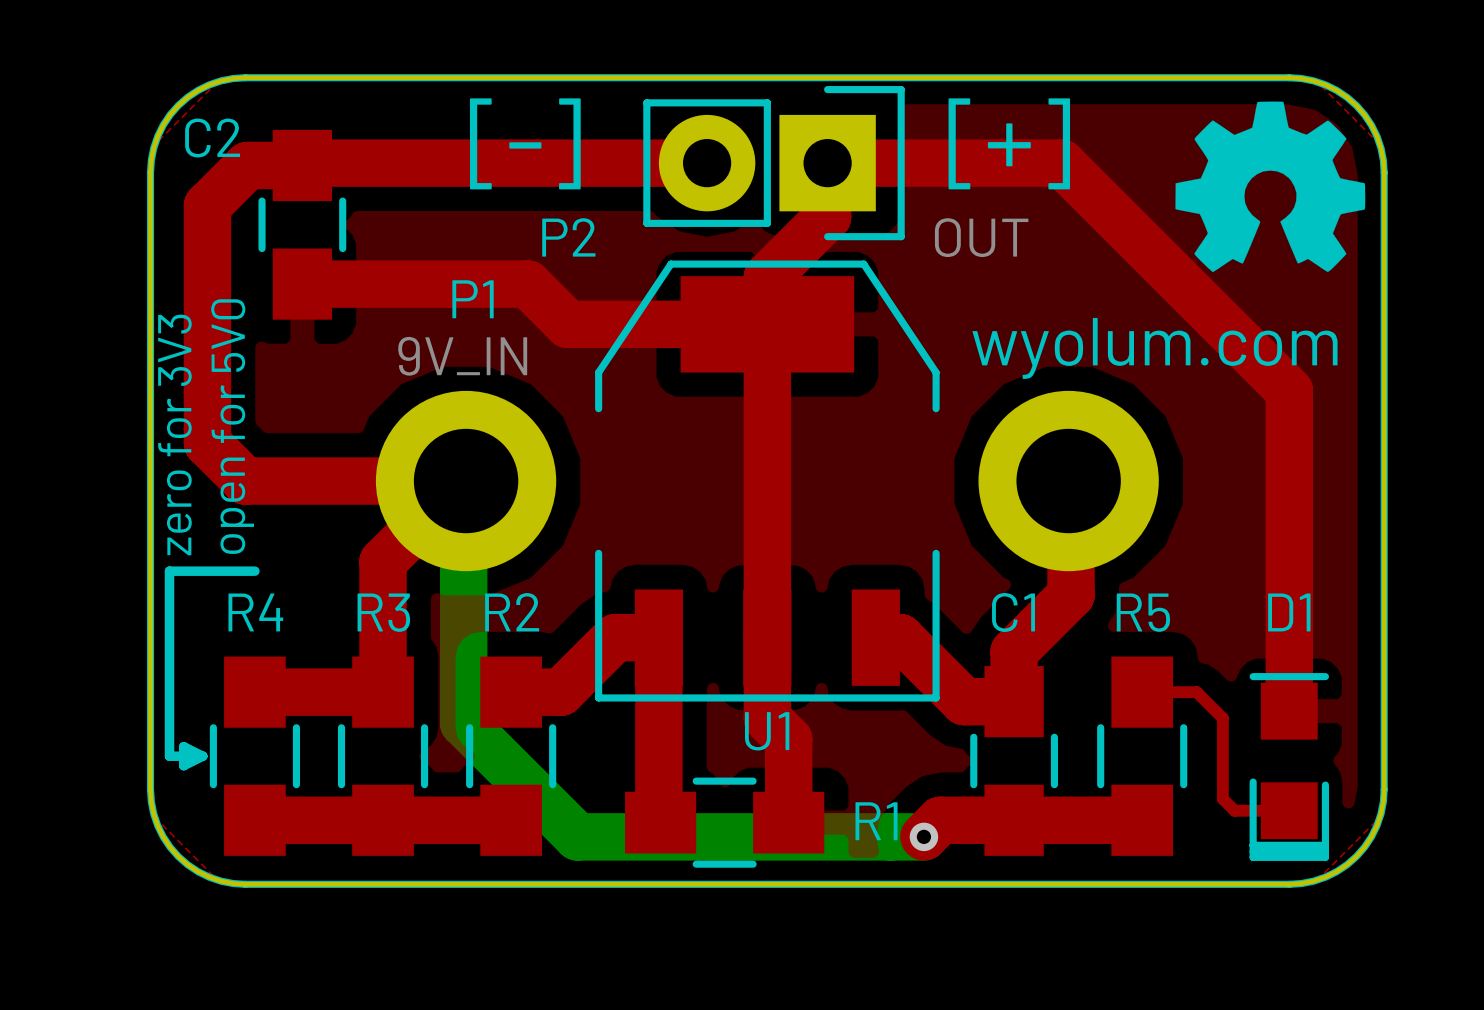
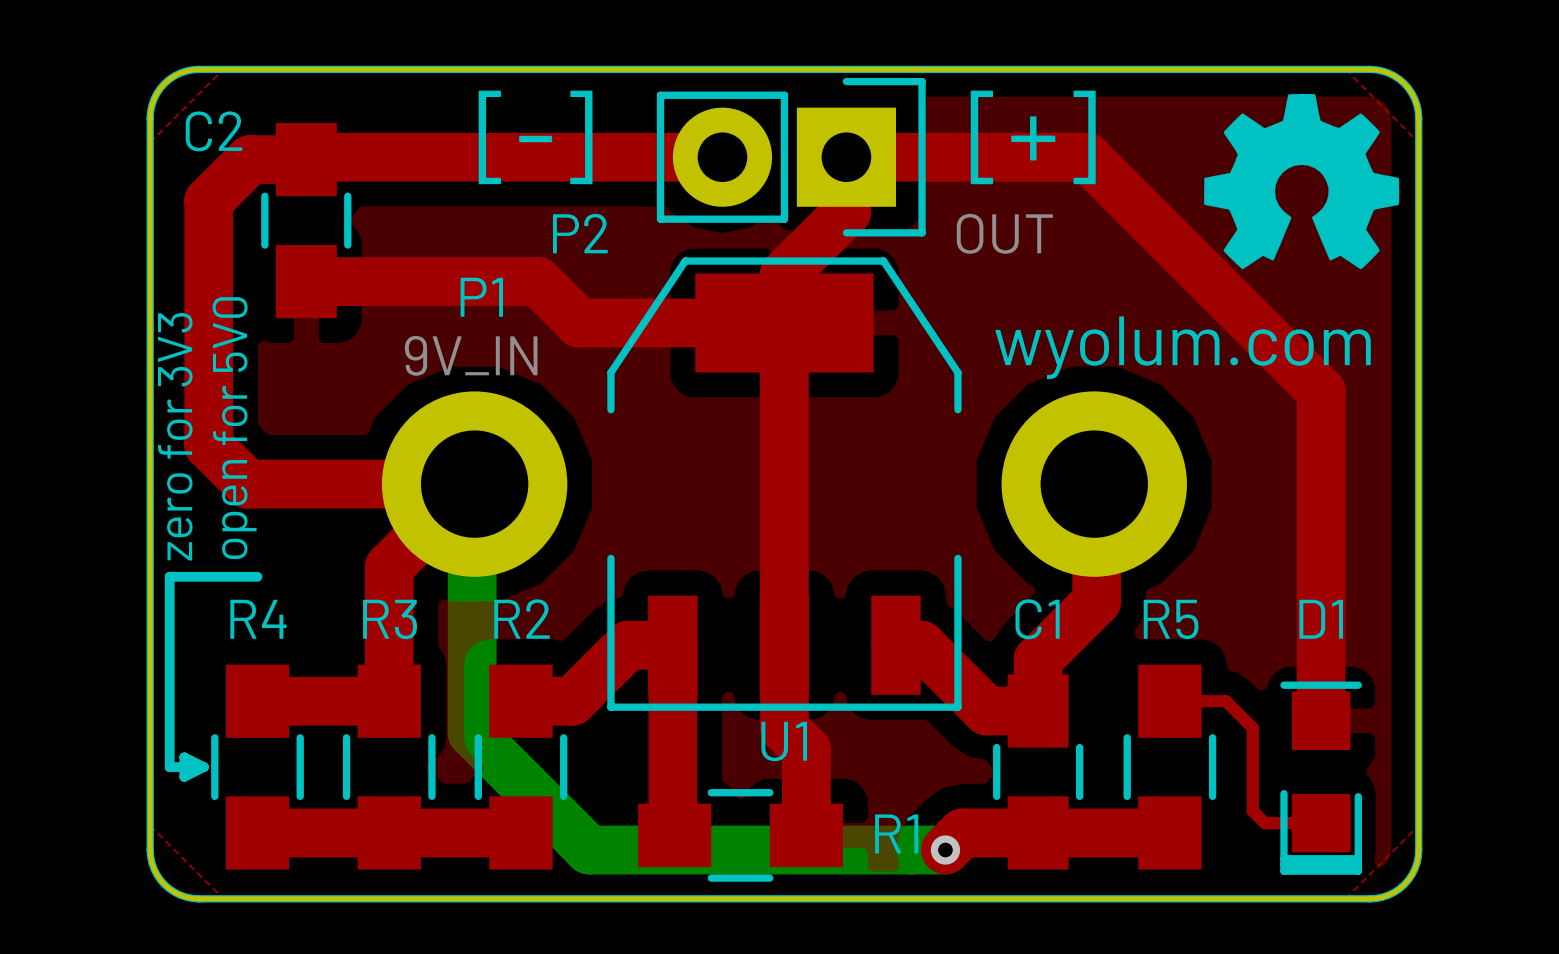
P1 footprint: [146, 74, 1388, 888] -> [146, 65, 1423, 903]
board edge: (245, 77) (220, 80) (209, 84) (197, 90) (178, 105) (163, 125) (157, 136) (153, 148) (150, 172) -> (247, 69) (192, 69) (180, 73) (164, 83) (153, 99) (150, 111) (150, 166)
board edge: (1289, 77) (1313, 80) (1325, 84) (1336, 90) (1356, 105) (1371, 125) (1376, 136) (1380, 148) (1384, 172) -> (1321, 69) (1376, 69) (1388, 73) (1404, 83) (1415, 99) (1418, 111) (1418, 166)
board edge: (150, 789) (153, 814) (157, 825) (163, 836) (178, 856) (197, 871) (209, 877) (220, 881) (245, 884) -> (150, 801) (150, 856) (153, 868) (164, 884) (180, 895) (192, 898) (247, 898)
board edge: (1384, 789) (1380, 814) (1376, 825) (1371, 836) (1356, 856) (1336, 871) (1325, 877) (1313, 881) (1289, 884) -> (1418, 801) (1418, 856) (1415, 868) (1404, 884) (1388, 895) (1376, 898) (1321, 898)

